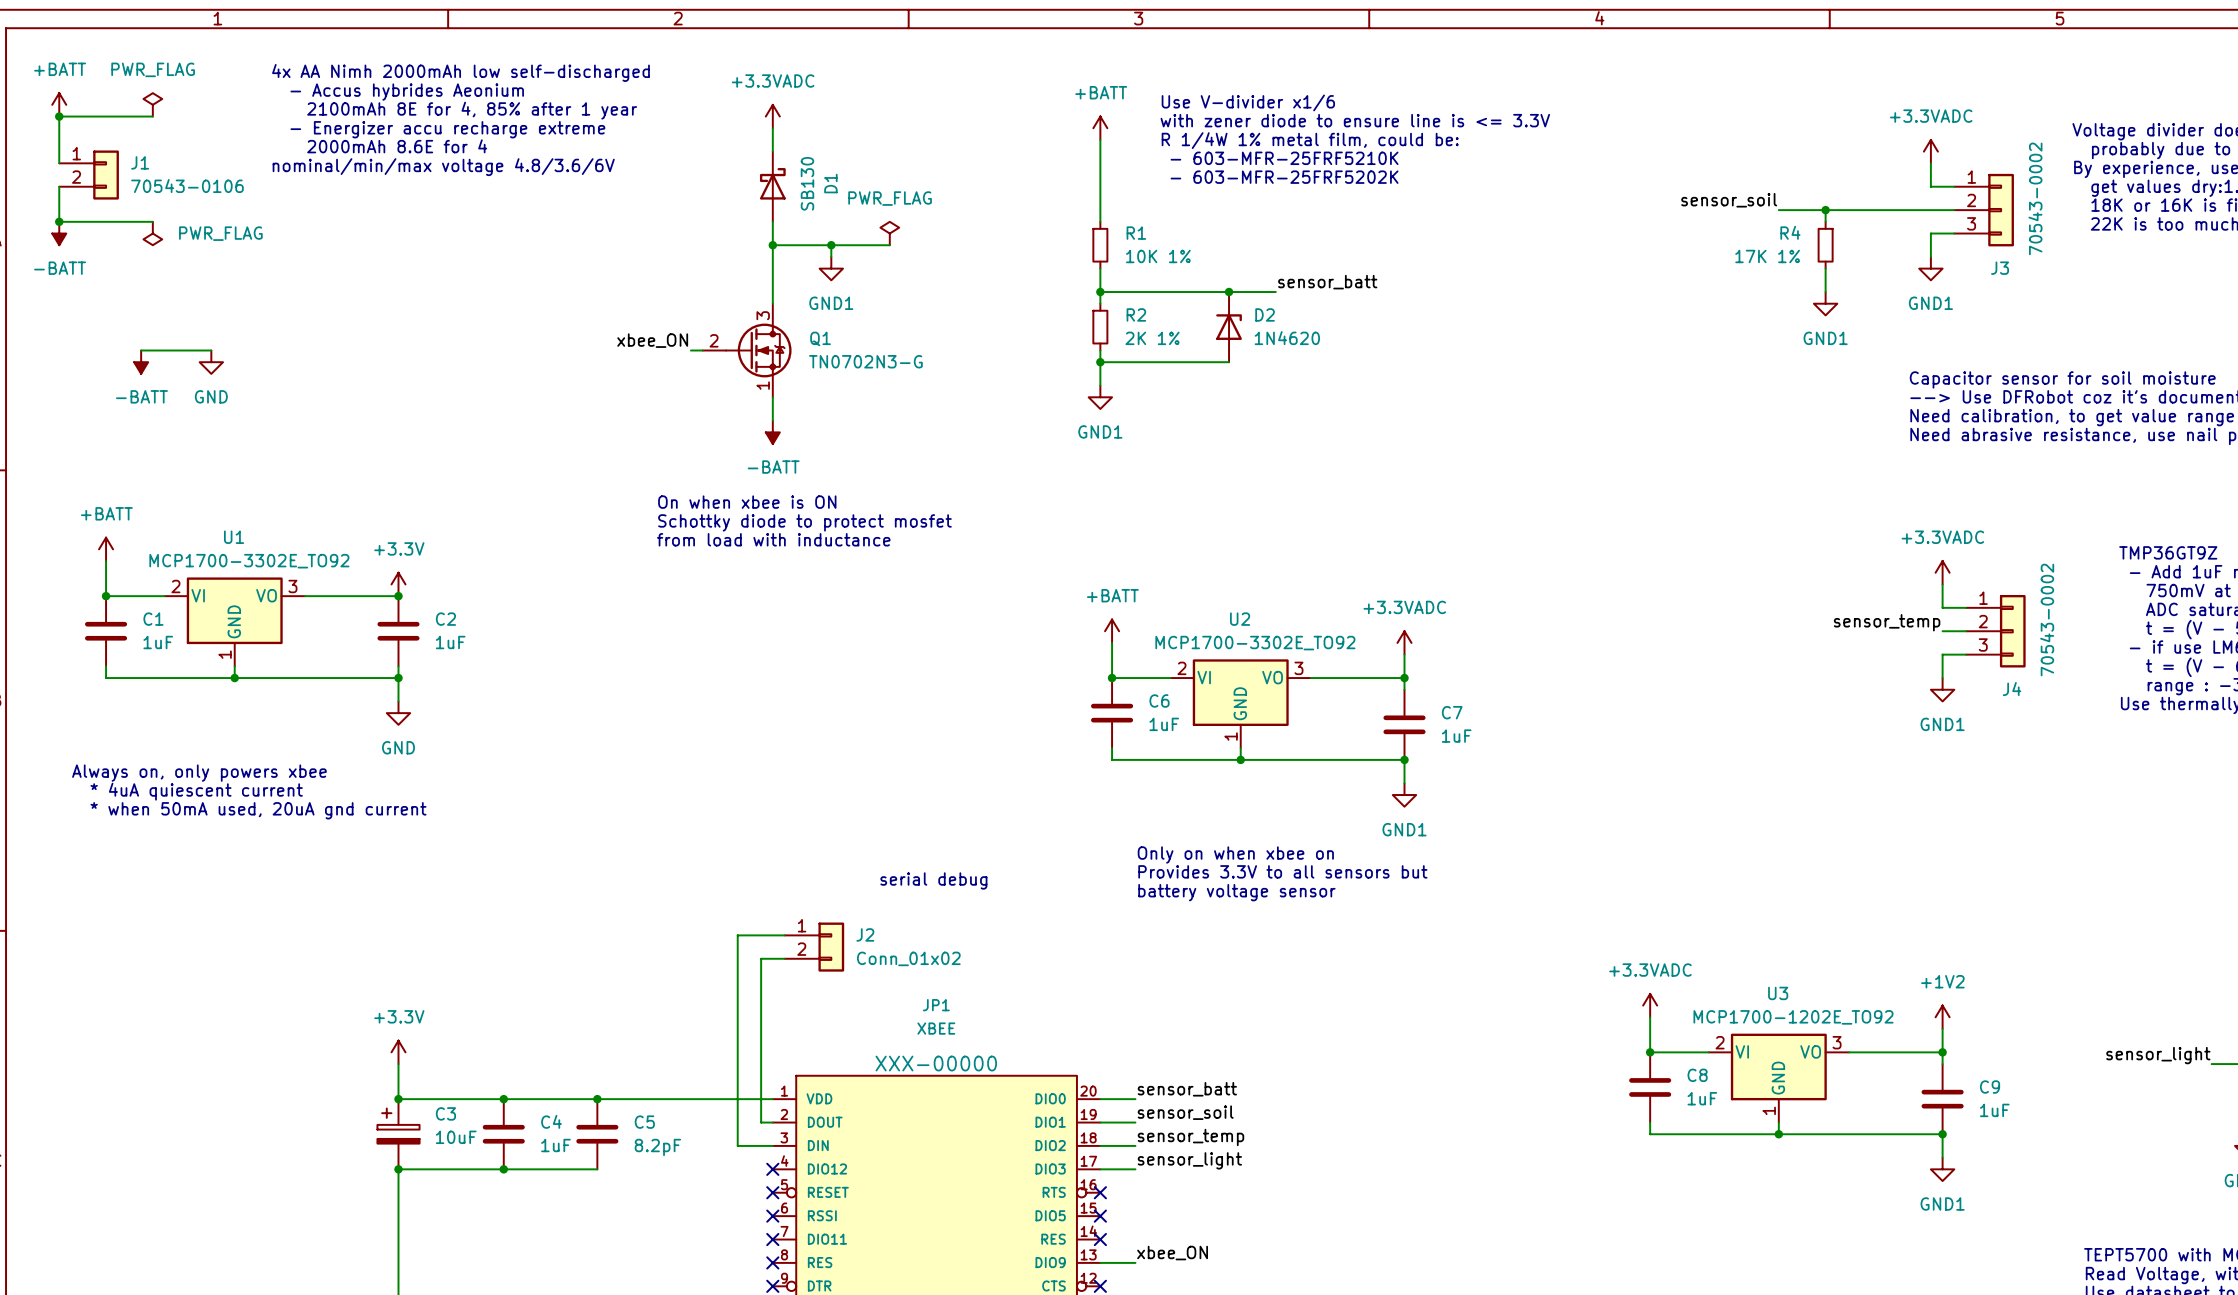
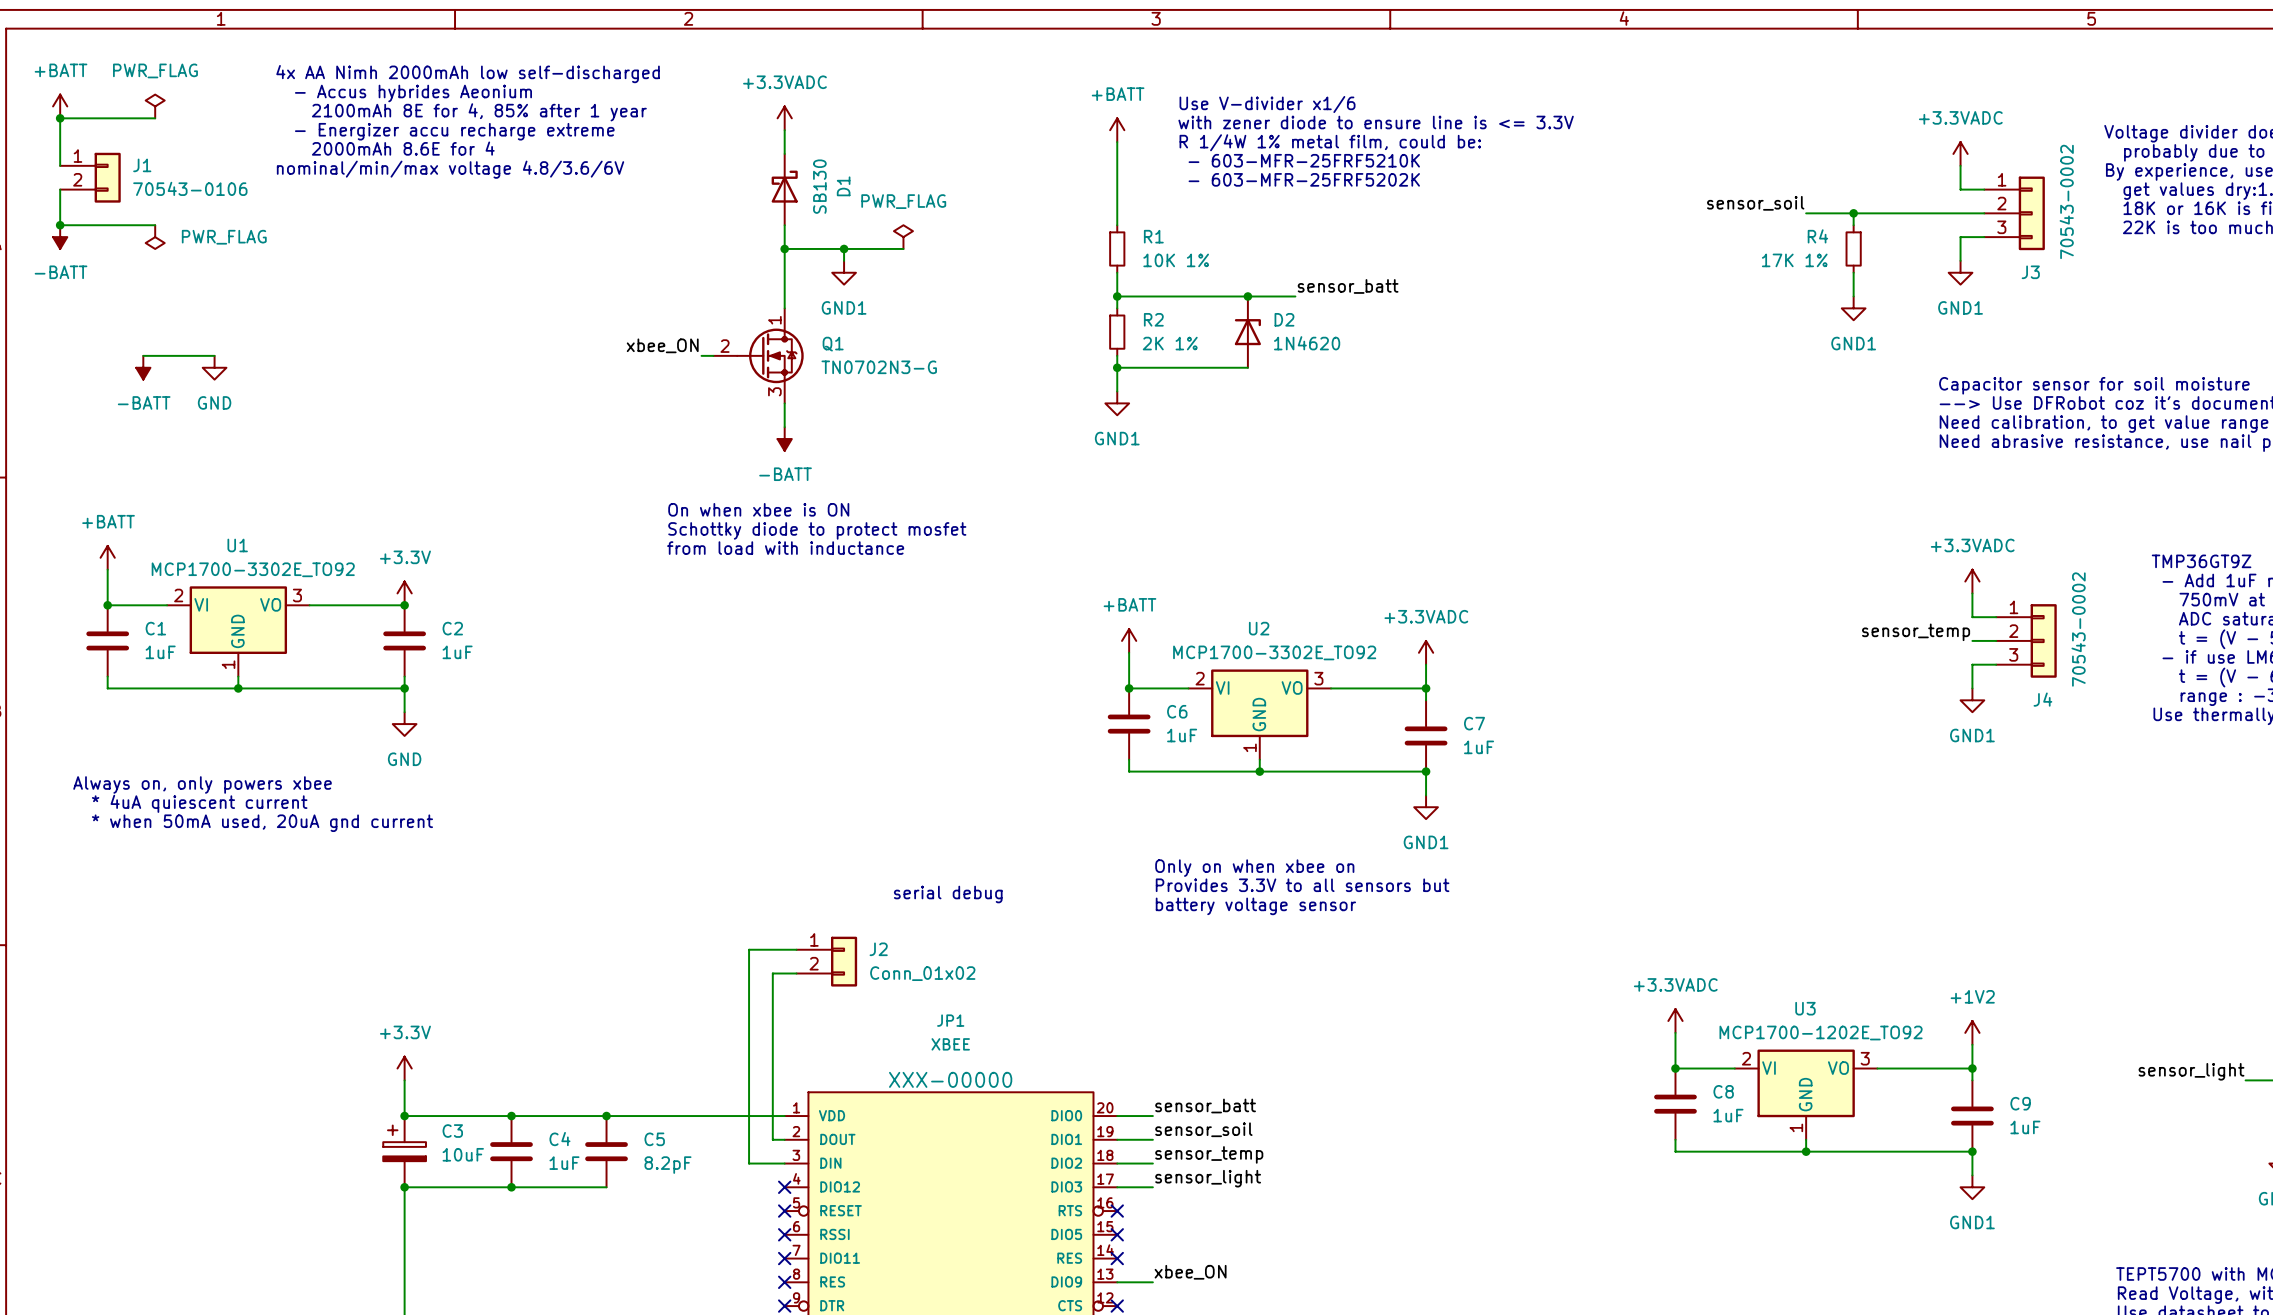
Q1 pin number: 3 (763, 315) -> 1 (774, 320)
Q1 pin number: 1 (763, 385) -> 3 (774, 391)

